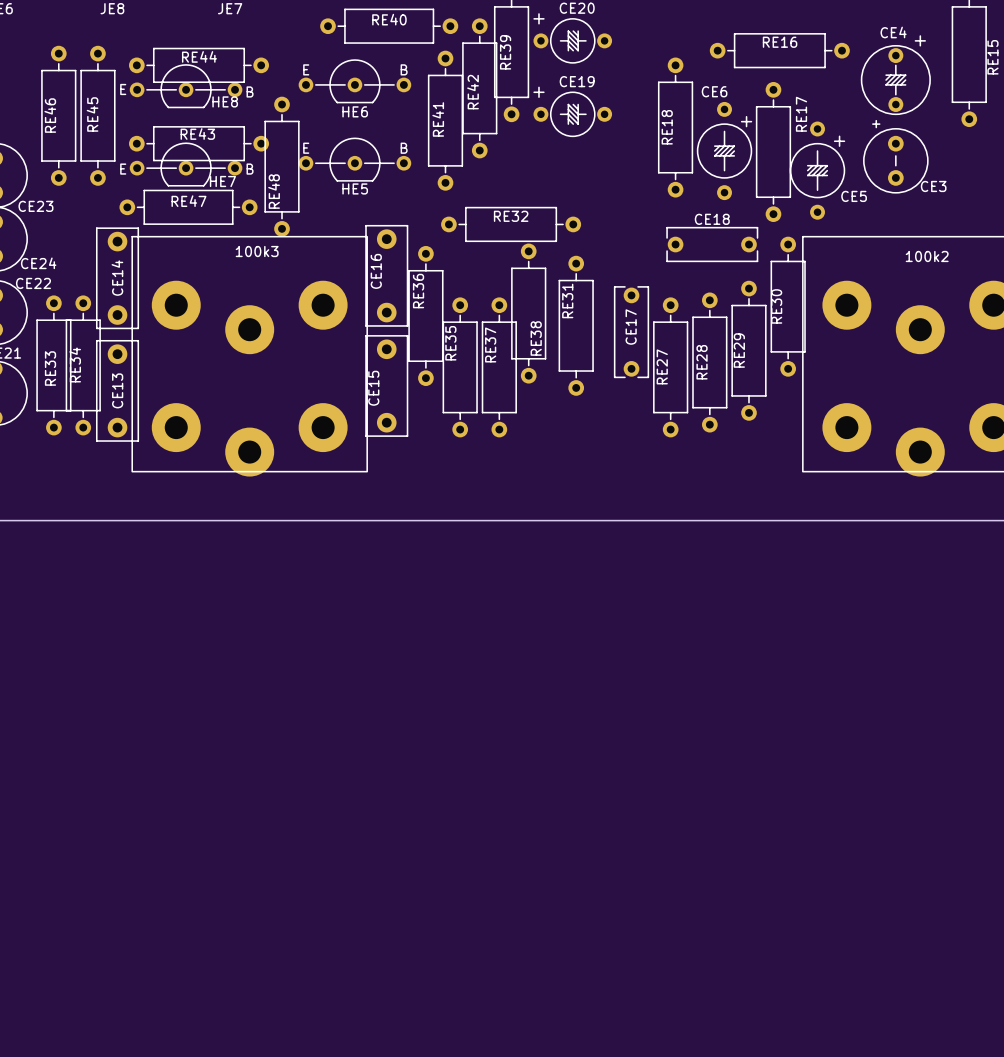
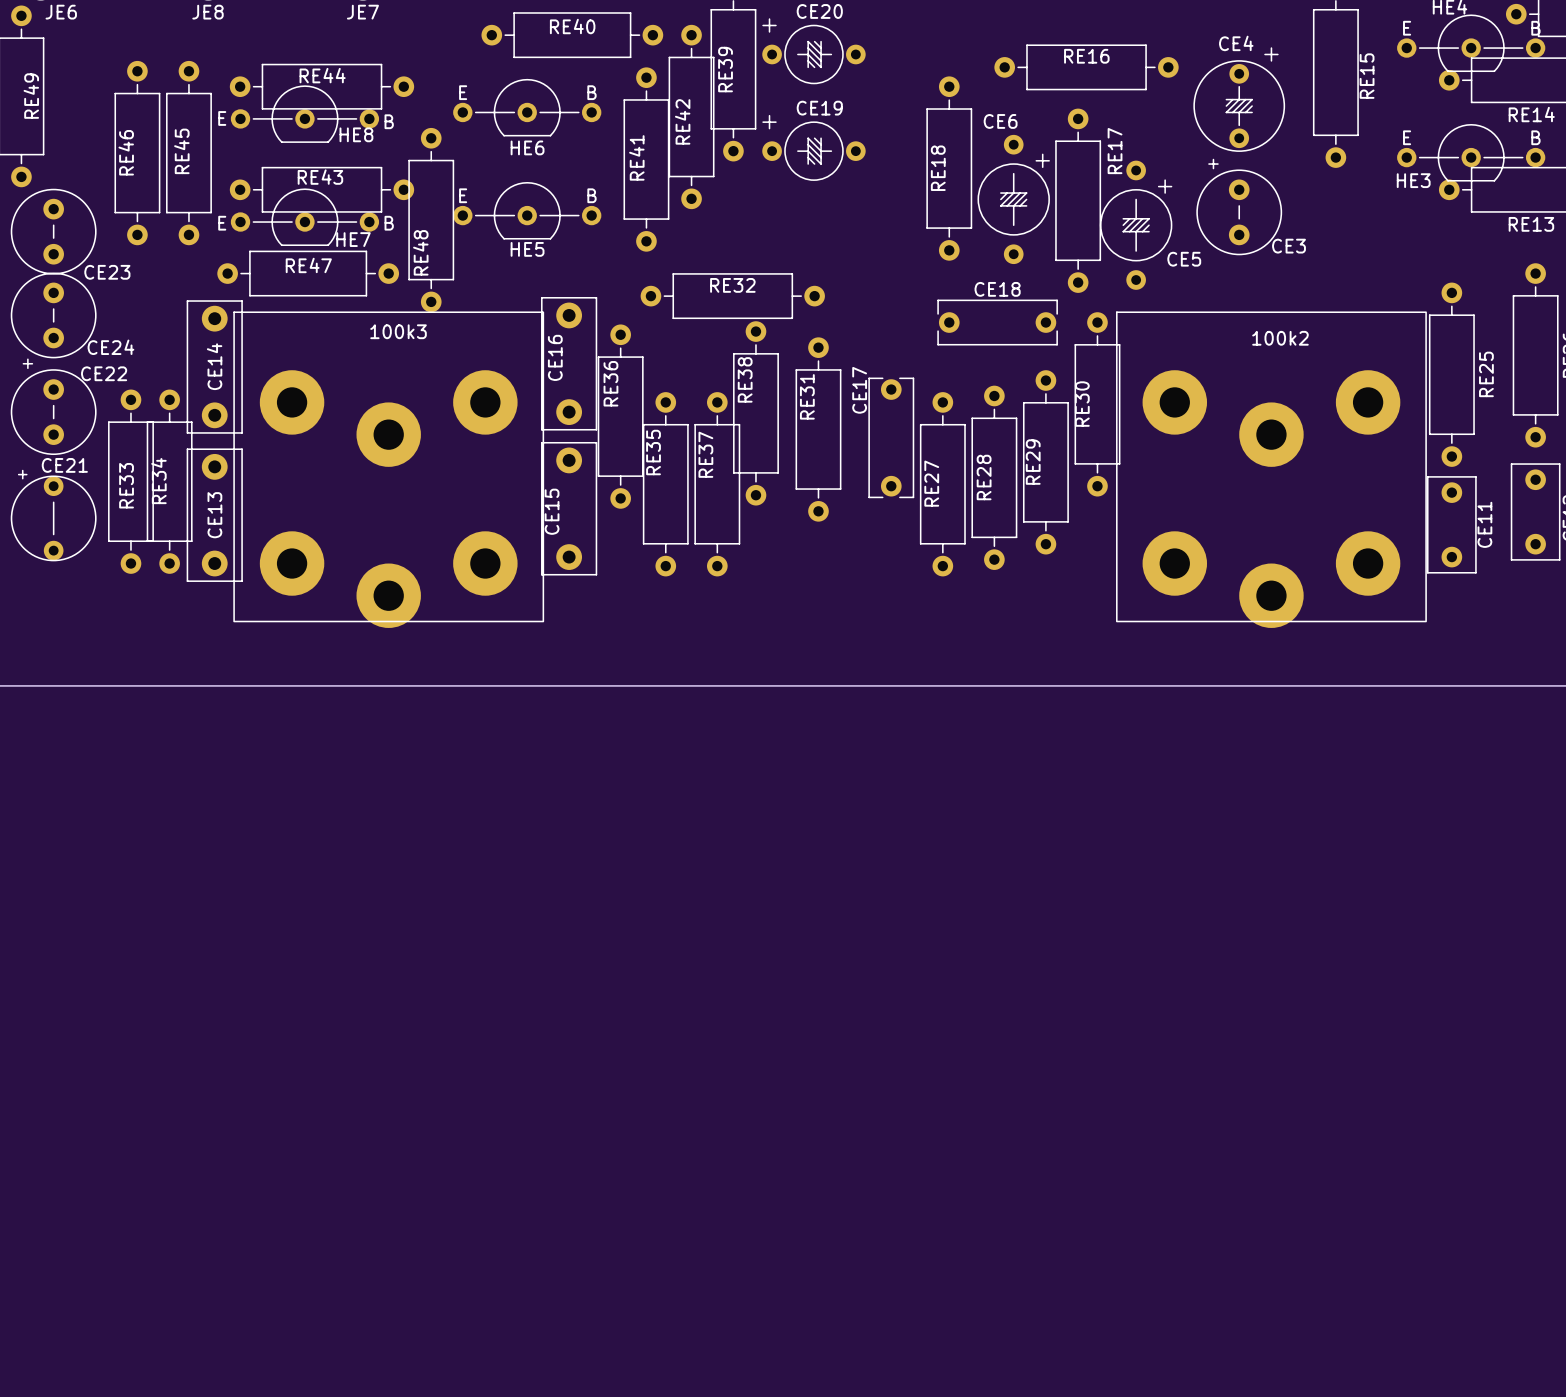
CE17 name position: CE17 (631, 327) -> CE17 (859, 390)
RE38 name position: RE38 (536, 338) -> RE38 (745, 379)

